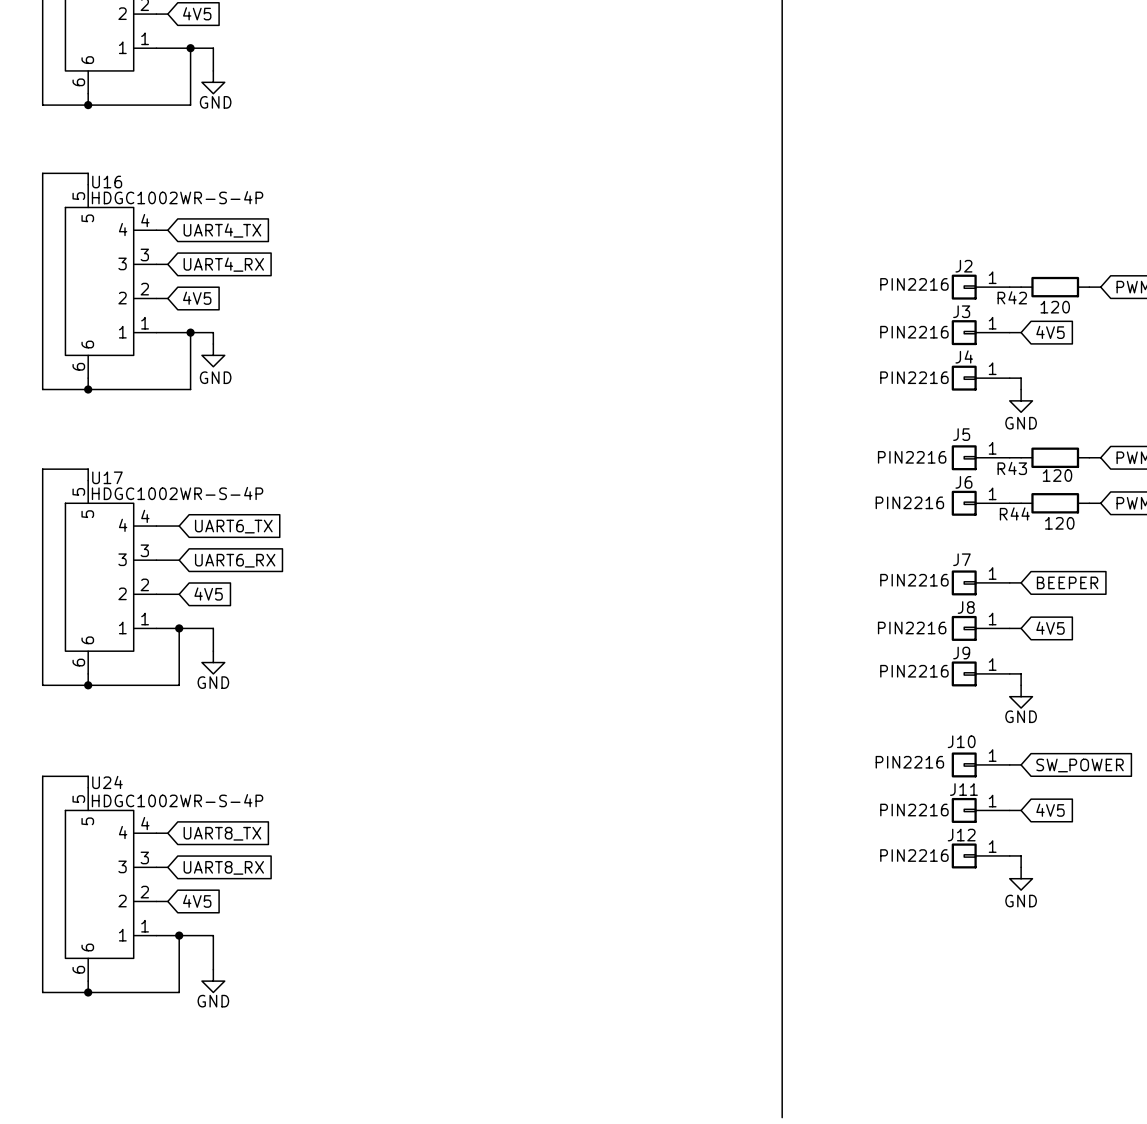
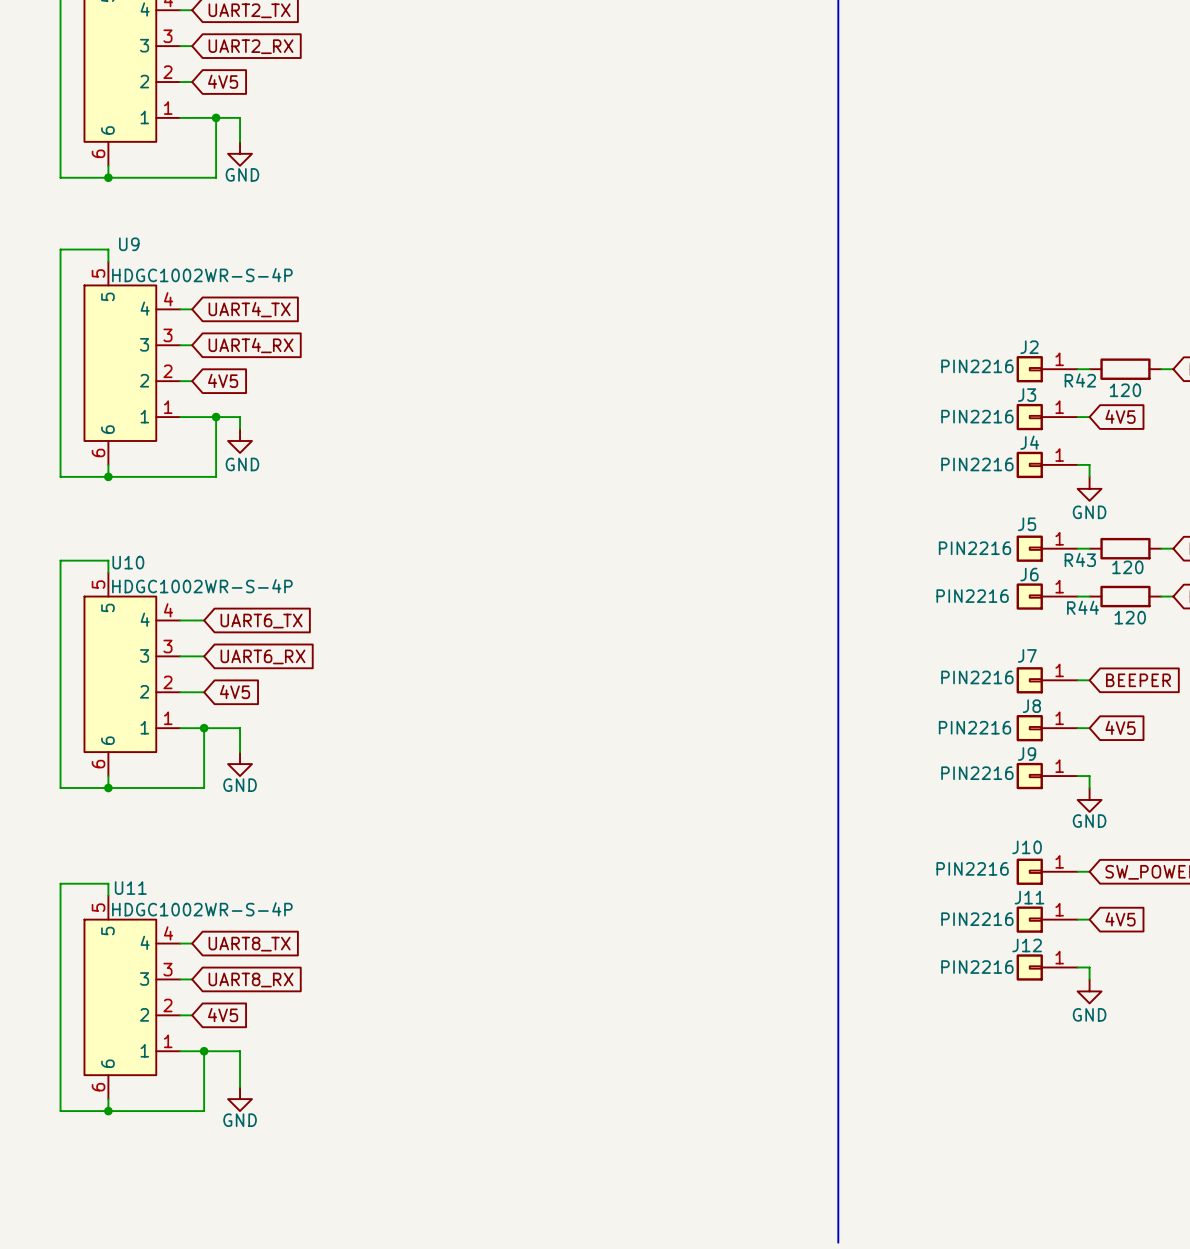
U16 name: U16 (107, 182) -> U9 (129, 244)
U17 name: U17 (107, 477) -> U10 (128, 562)
U24 name: U24 (107, 782) -> U11 (130, 888)

